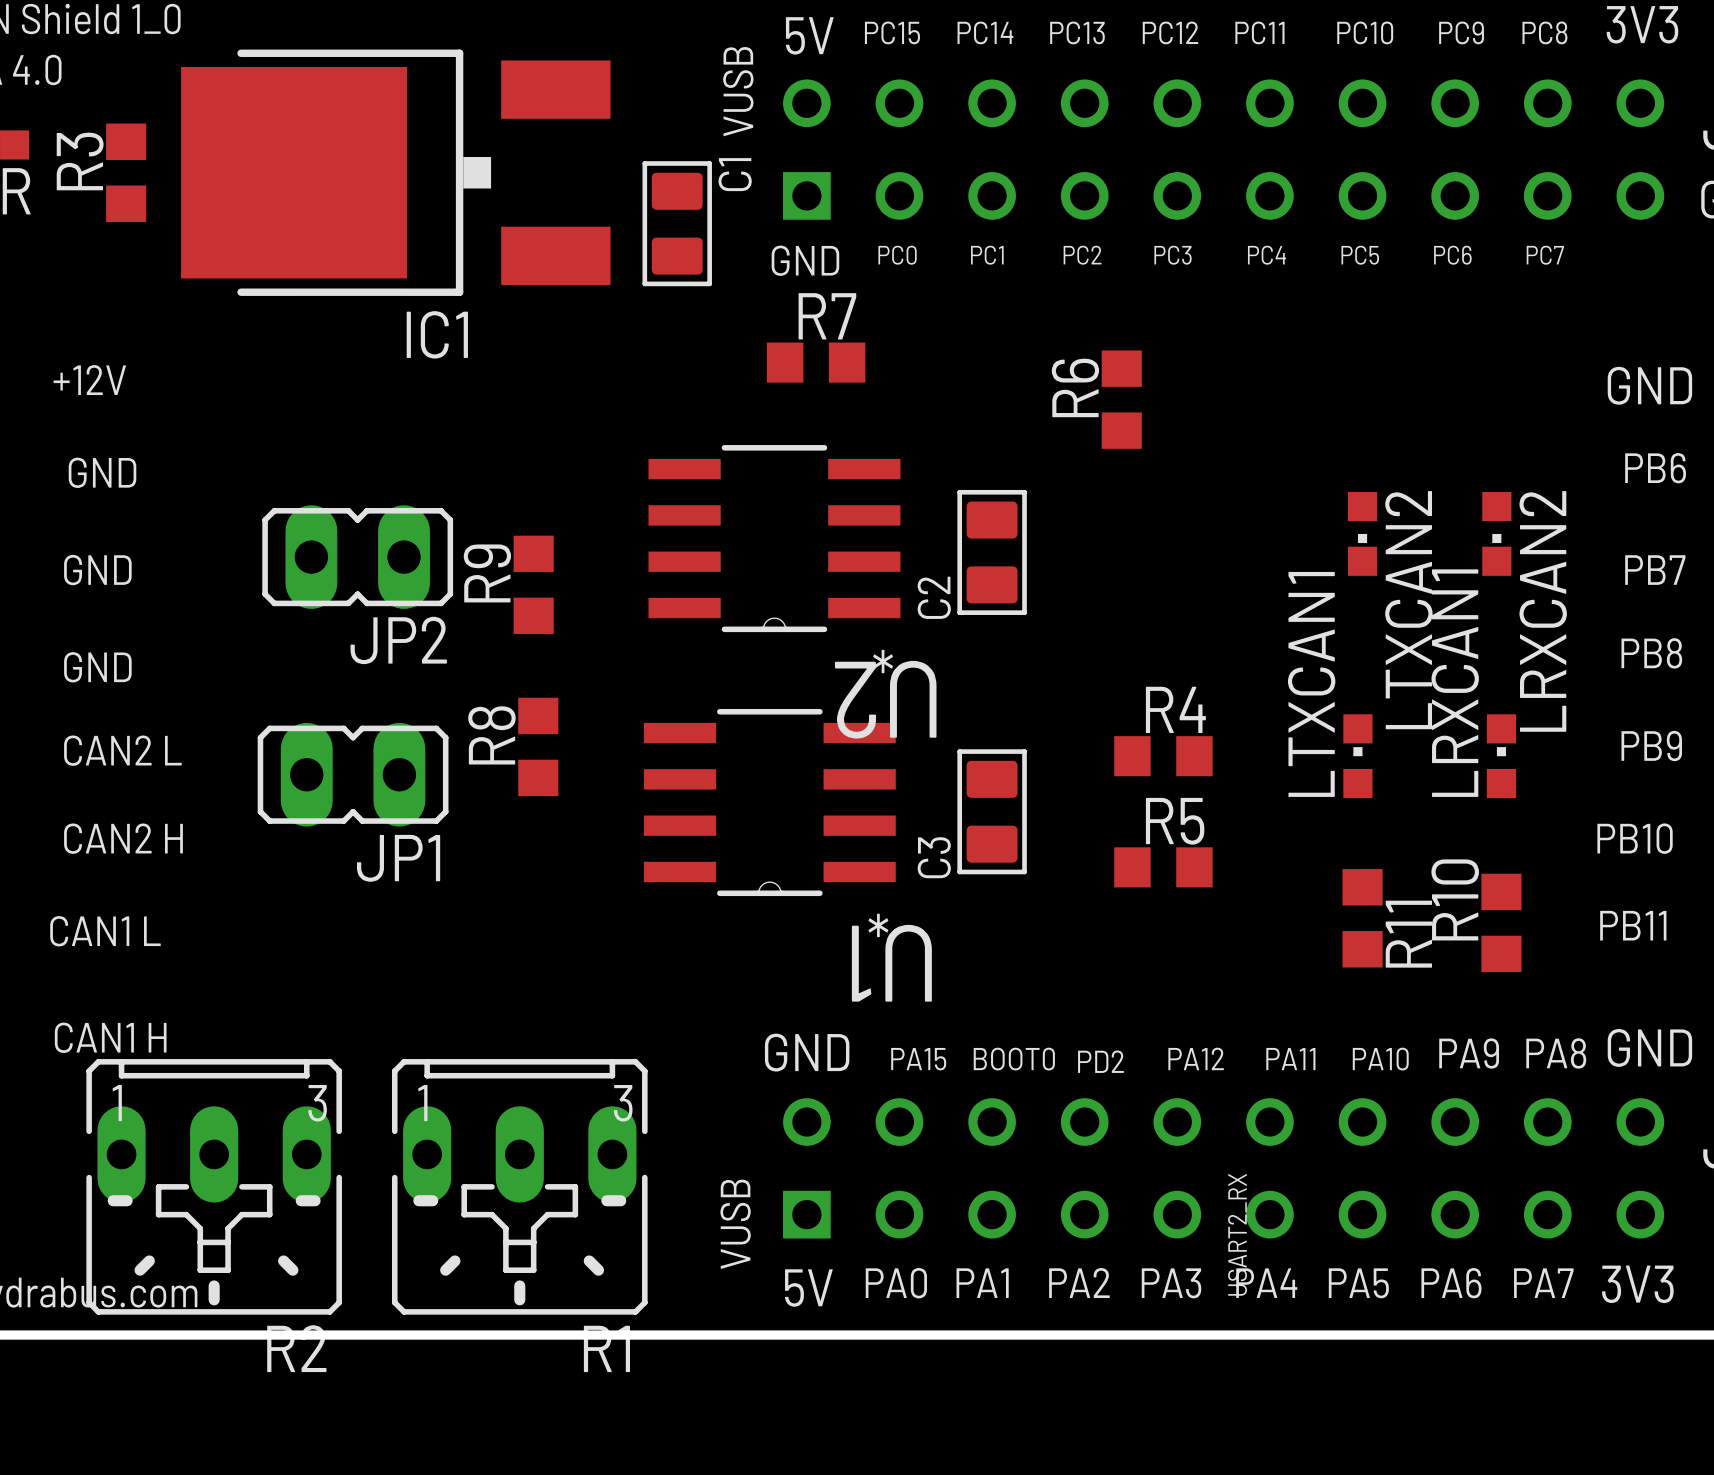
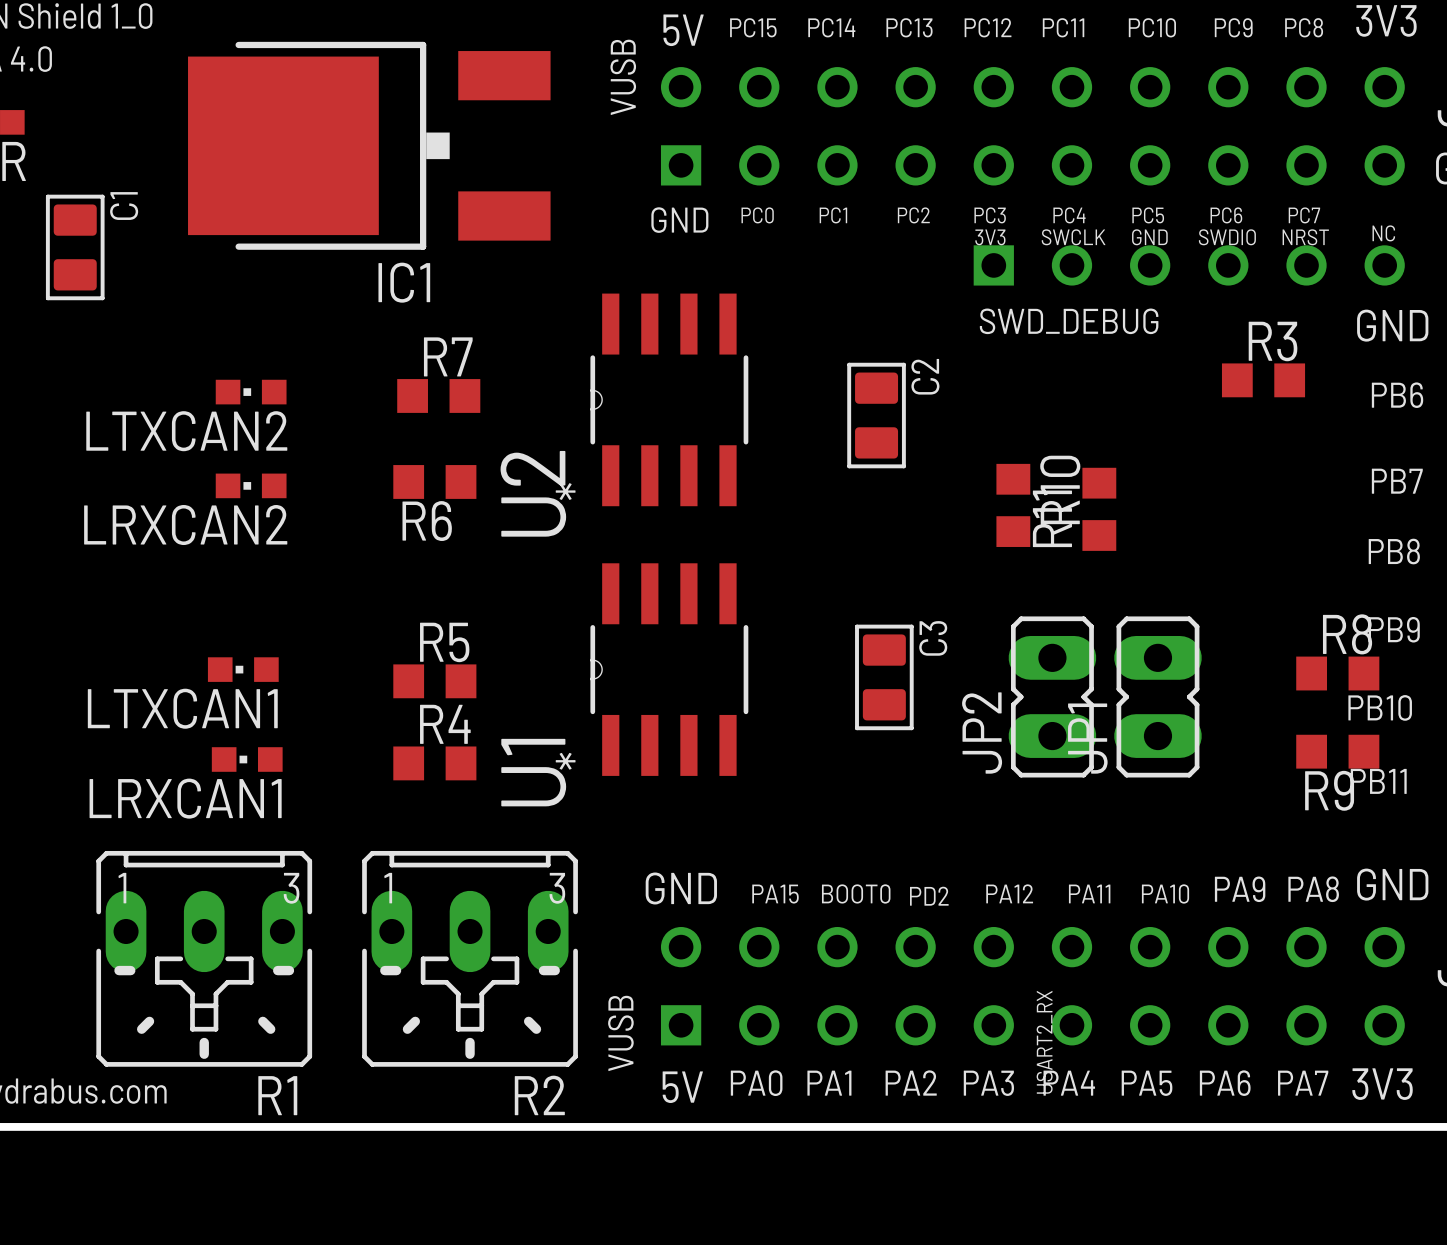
R3 rotation: 0° (126, 172) -> 90° clockwise (1263, 380)
R3 position: (126, 172) -> (1263, 380)
IC1 position: (395, 172) -> (369, 145)
C1 position: (677, 223) -> (75, 247)
text: none -> NC (1383, 233)
text: none -> 3V3 (990, 237)
text: none -> SWCLK (1073, 237)
text: none -> GND (1149, 237)
text: none -> SWDIO (1227, 237)
text: none -> NRST (1305, 237)
SWD_DEBUG: none -> (1189, 265)
R7 position: (816, 362) -> (438, 395)
text: +12V (89, 380) -> none
R6 name position: R6 (1075, 387) -> R6 (427, 521)
R6 rotation: 0° (1121, 399) -> 90° clockwise (434, 481)
R6 position: (1121, 399) -> (434, 481)
text: GND (102, 472) -> none
LTXCAN2 rotation: 0° (1362, 533) -> 90° clockwise (251, 392)
LTXCAN2 position: (1362, 533) -> (251, 392)
LRXCAN2 rotation: 0° (1496, 533) -> 90° clockwise (251, 485)
LRXCAN2 position: (1496, 533) -> (251, 485)
U2 rotation: 0° (774, 538) -> 90° clockwise (669, 399)
C2 position: (992, 552) -> (876, 415)
JP2 rotation: 0° (357, 557) -> 90° clockwise (1052, 696)
JP2 position: (357, 557) -> (1052, 696)
text: GND (97, 570) -> none
R9 name position: R9 (487, 573) -> R9 (1329, 790)
R9 rotation: 0° (533, 584) -> 90° clockwise (1337, 751)
R9 position: (533, 584) -> (1337, 751)
C2 name position: C2 (934, 597) -> C2 (925, 376)
text: GND (97, 667) -> none
R8 rotation: 0° (538, 746) -> 90° clockwise (1337, 673)
R8 position: (538, 746) -> (1337, 673)
text: CAN2 L (122, 750) -> none
R4 position: (1163, 756) -> (434, 763)
LTXCAN1 rotation: 0° (1357, 756) -> 90° counterclockwise (243, 669)
LTXCAN1 position: (1357, 756) -> (243, 669)
LRXCAN1 rotation: 0° (1501, 756) -> 90° counterclockwise (247, 759)
LRXCAN1 position: (1501, 756) -> (247, 759)
JP1 rotation: 0° (353, 774) -> 90° clockwise (1157, 696)
JP1 position: (353, 774) -> (1157, 696)
U1 rotation: 0° (769, 802) -> 90° clockwise (669, 669)
C3 position: (992, 811) -> (884, 677)
text: CAN2 H (123, 838) -> none
C3 name position: C3 (934, 857) -> C3 (933, 638)
R5 position: (1163, 867) -> (434, 681)
R11 position: (1362, 918) -> (1013, 505)
R10 position: (1501, 922) -> (1099, 509)
text: CAN1 L (105, 931) -> none
text: CAN1 H (110, 1037) -> none
R2 position: (214, 1186) -> (470, 958)
R1 position: (519, 1186) -> (204, 958)

